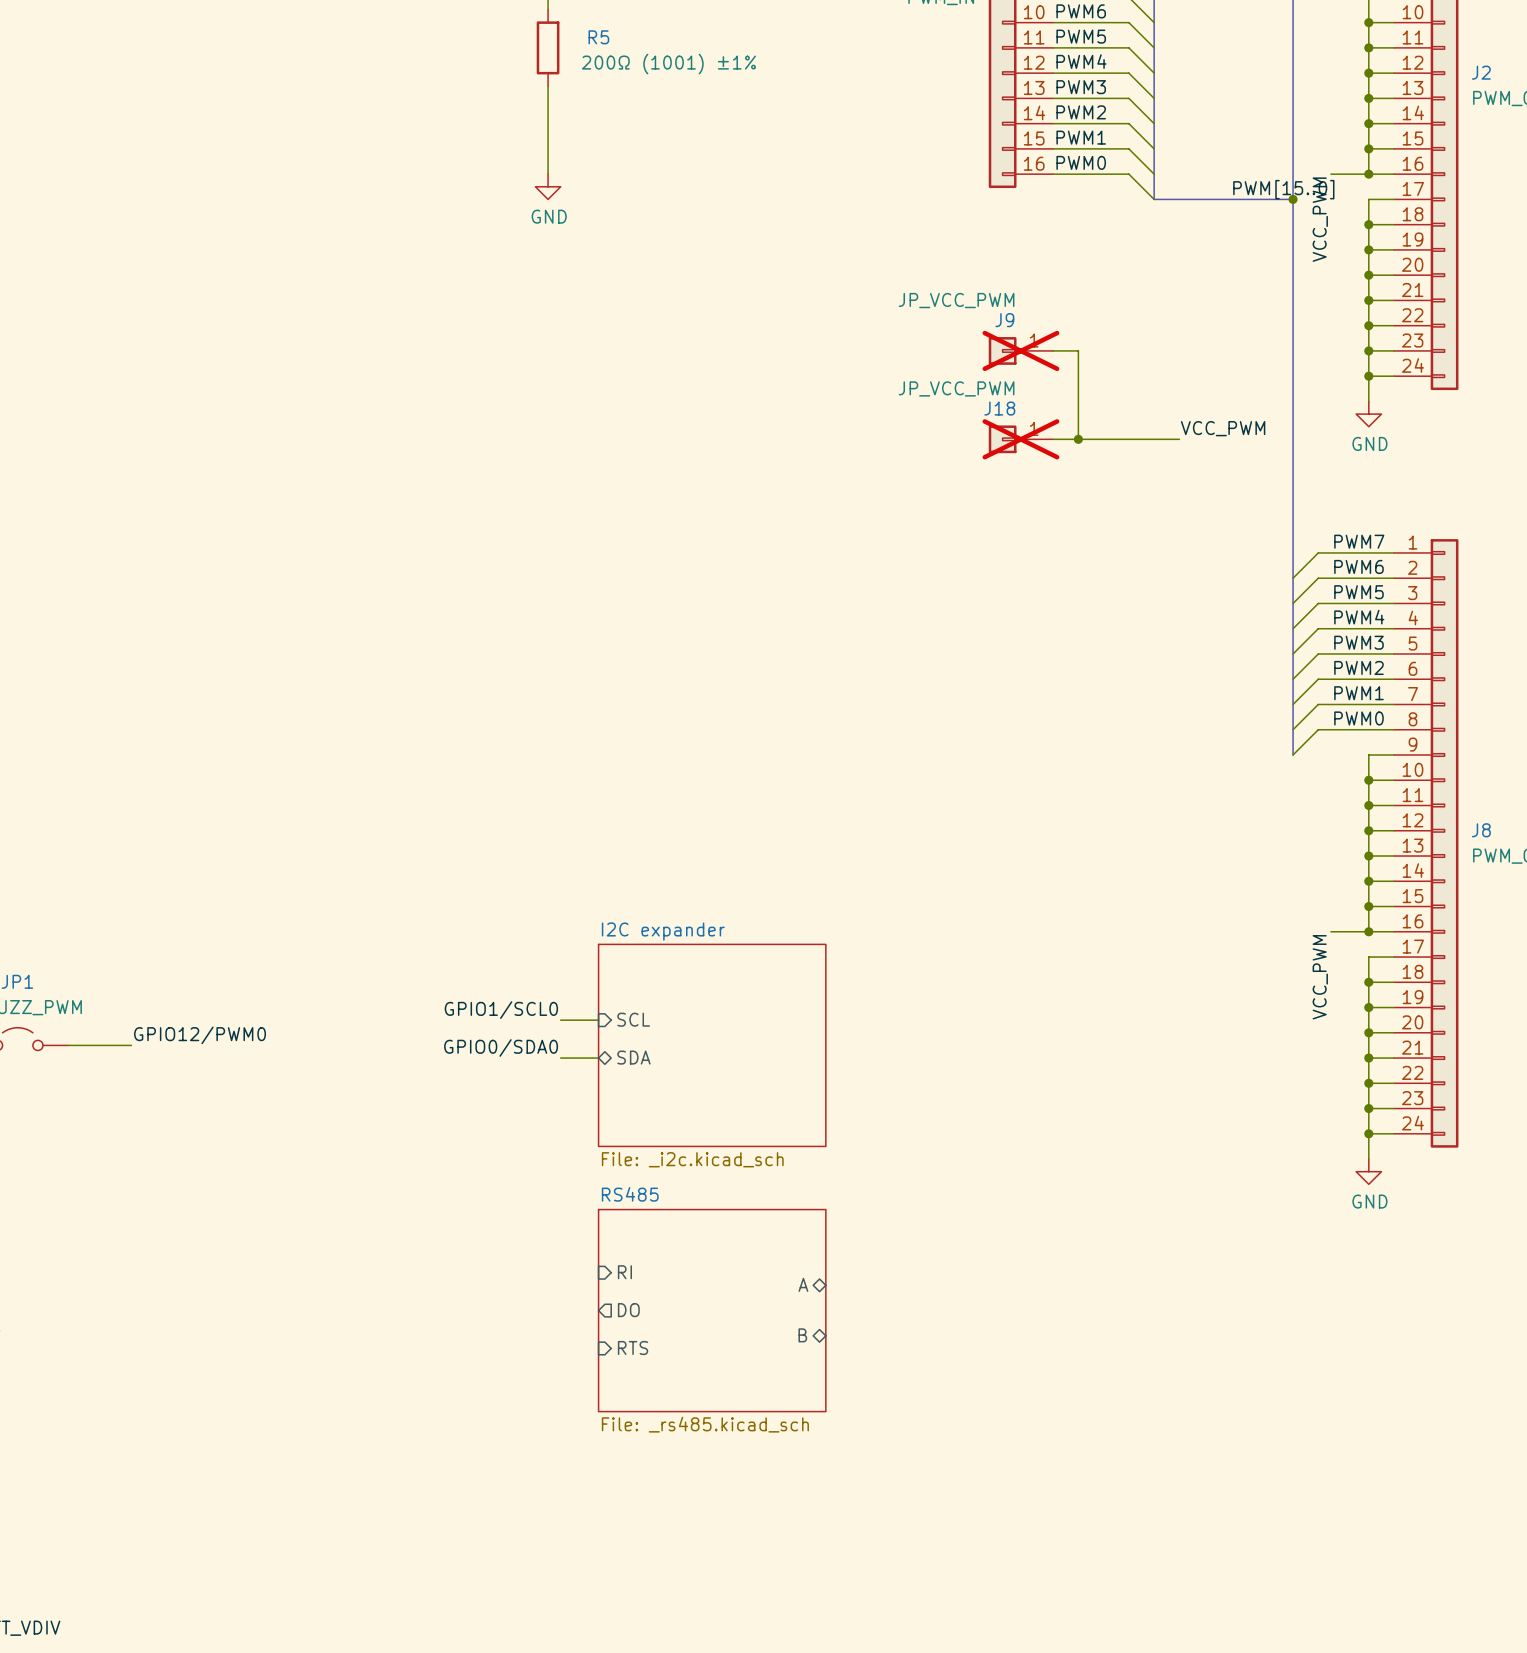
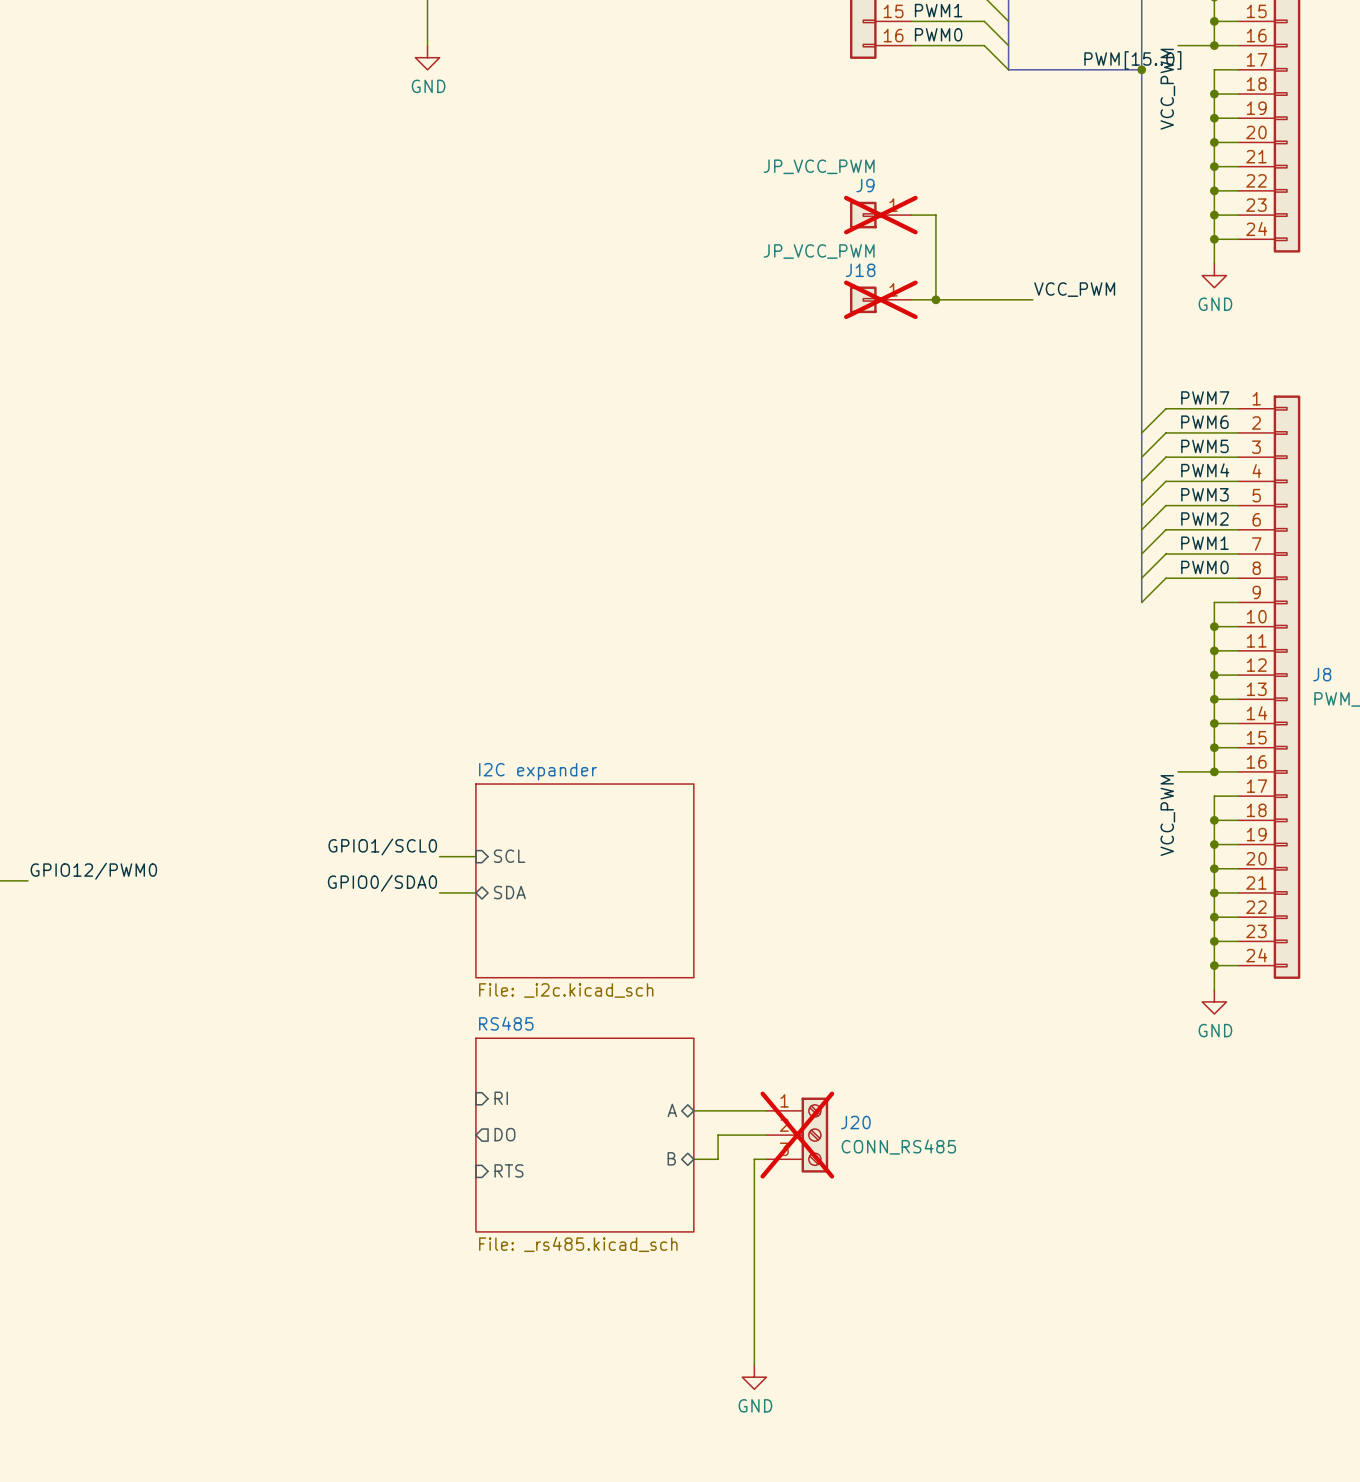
wire: none -> (693, 1110) (766, 1110)
wire: none -> (766, 1135) (718, 1135) (718, 1159) (693, 1159)
J20: none -> CONN_RS485 (797, 1135)
wire: none -> (766, 1159) (754, 1159) (754, 1365)
power symbol: none -> GND (754, 1377)

